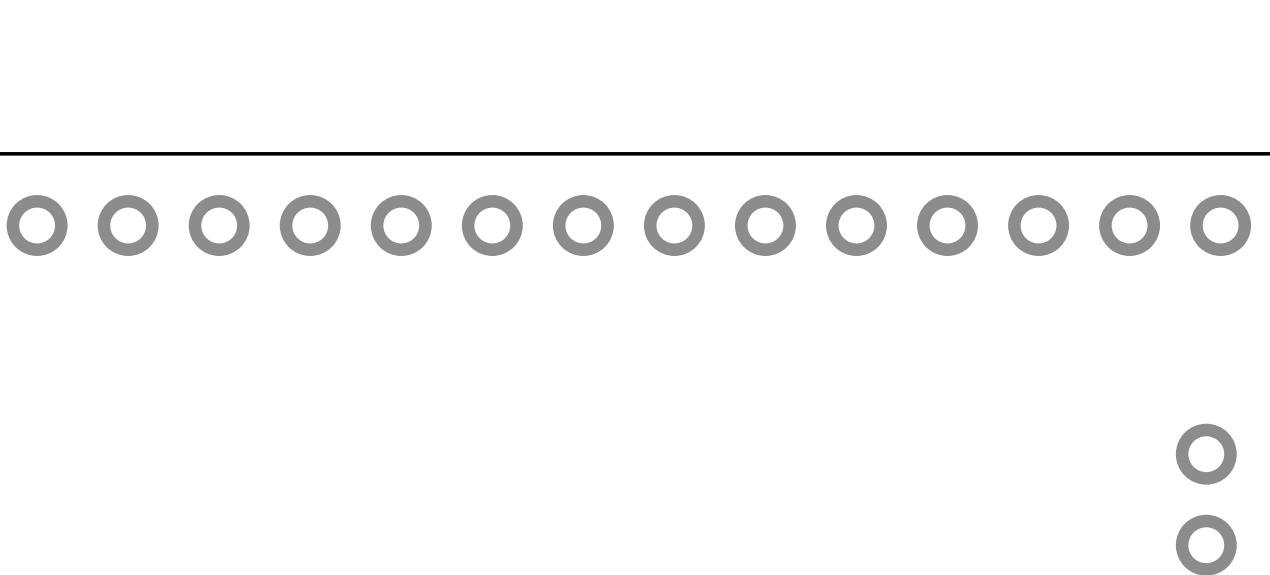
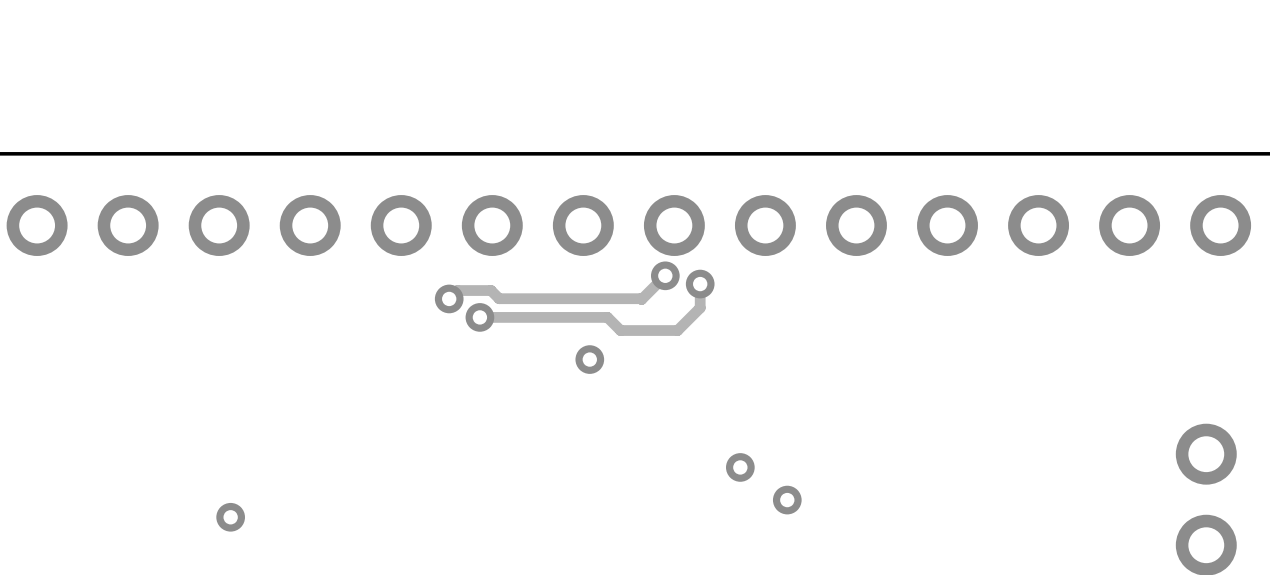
track: none -> (665, 275) (641, 299) (499, 298) (491, 290) (457, 290) (449, 298)
via: none -> (665, 275)
via: none -> (700, 284)
track: none -> (697, 286) (700, 284) (700, 307) (677, 330) (620, 330) (607, 317) (479, 317)
via: none -> (449, 298)
via: none -> (479, 317)
via: none -> (589, 359)
via: none -> (740, 467)
via: none -> (787, 500)
via: none -> (230, 517)

